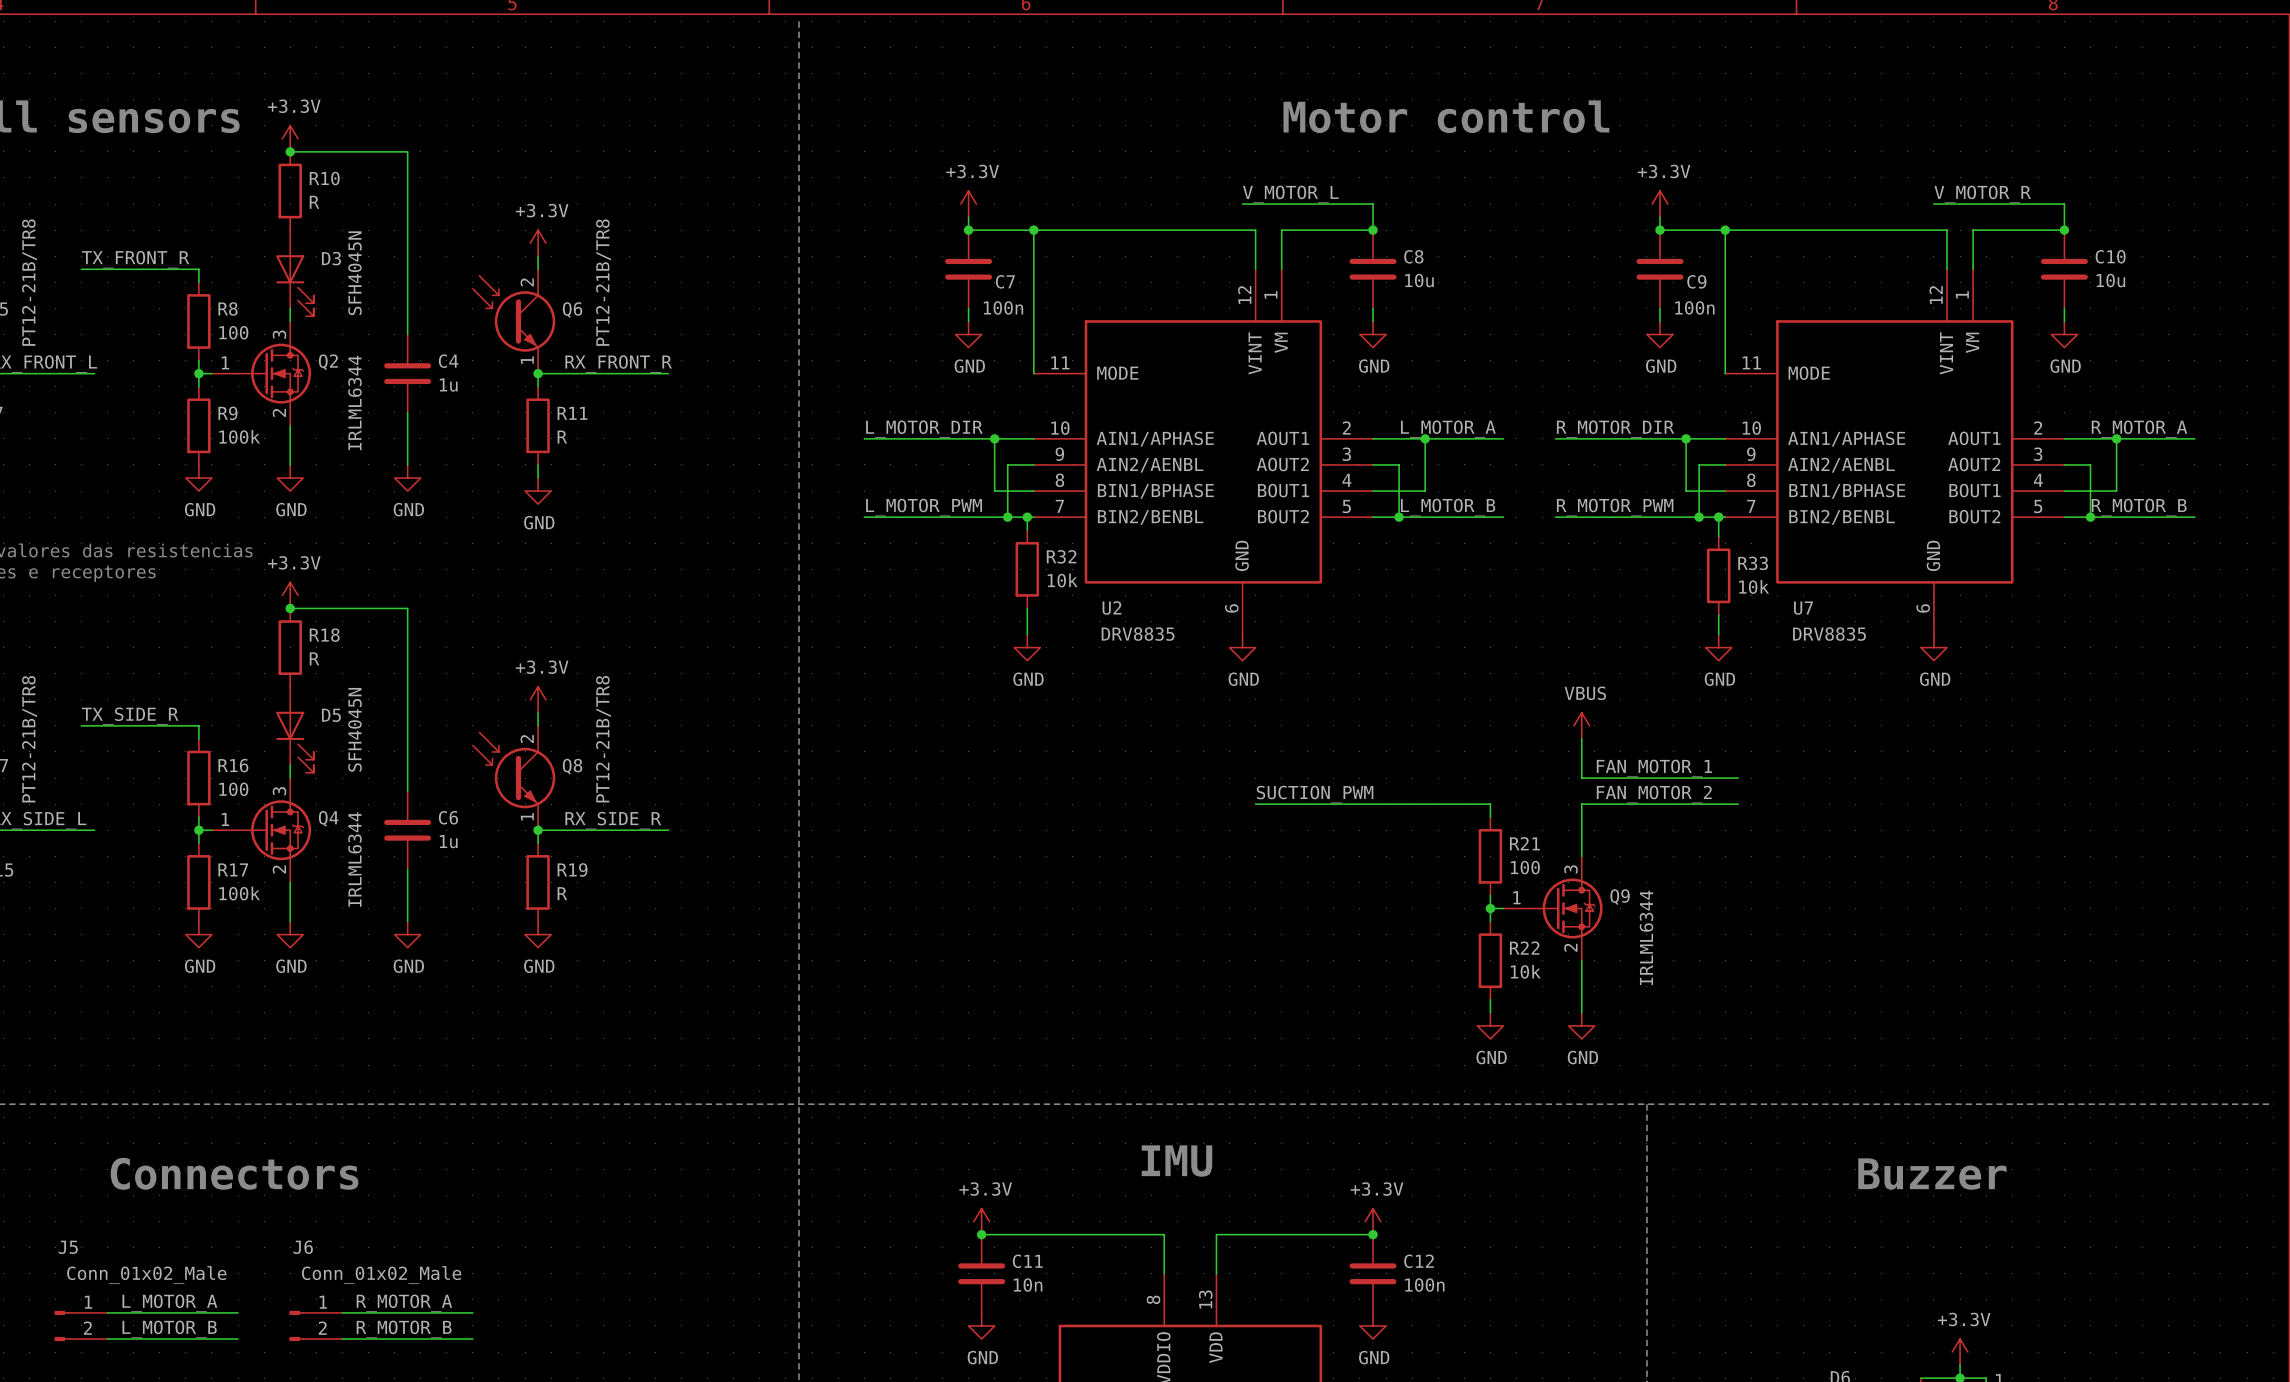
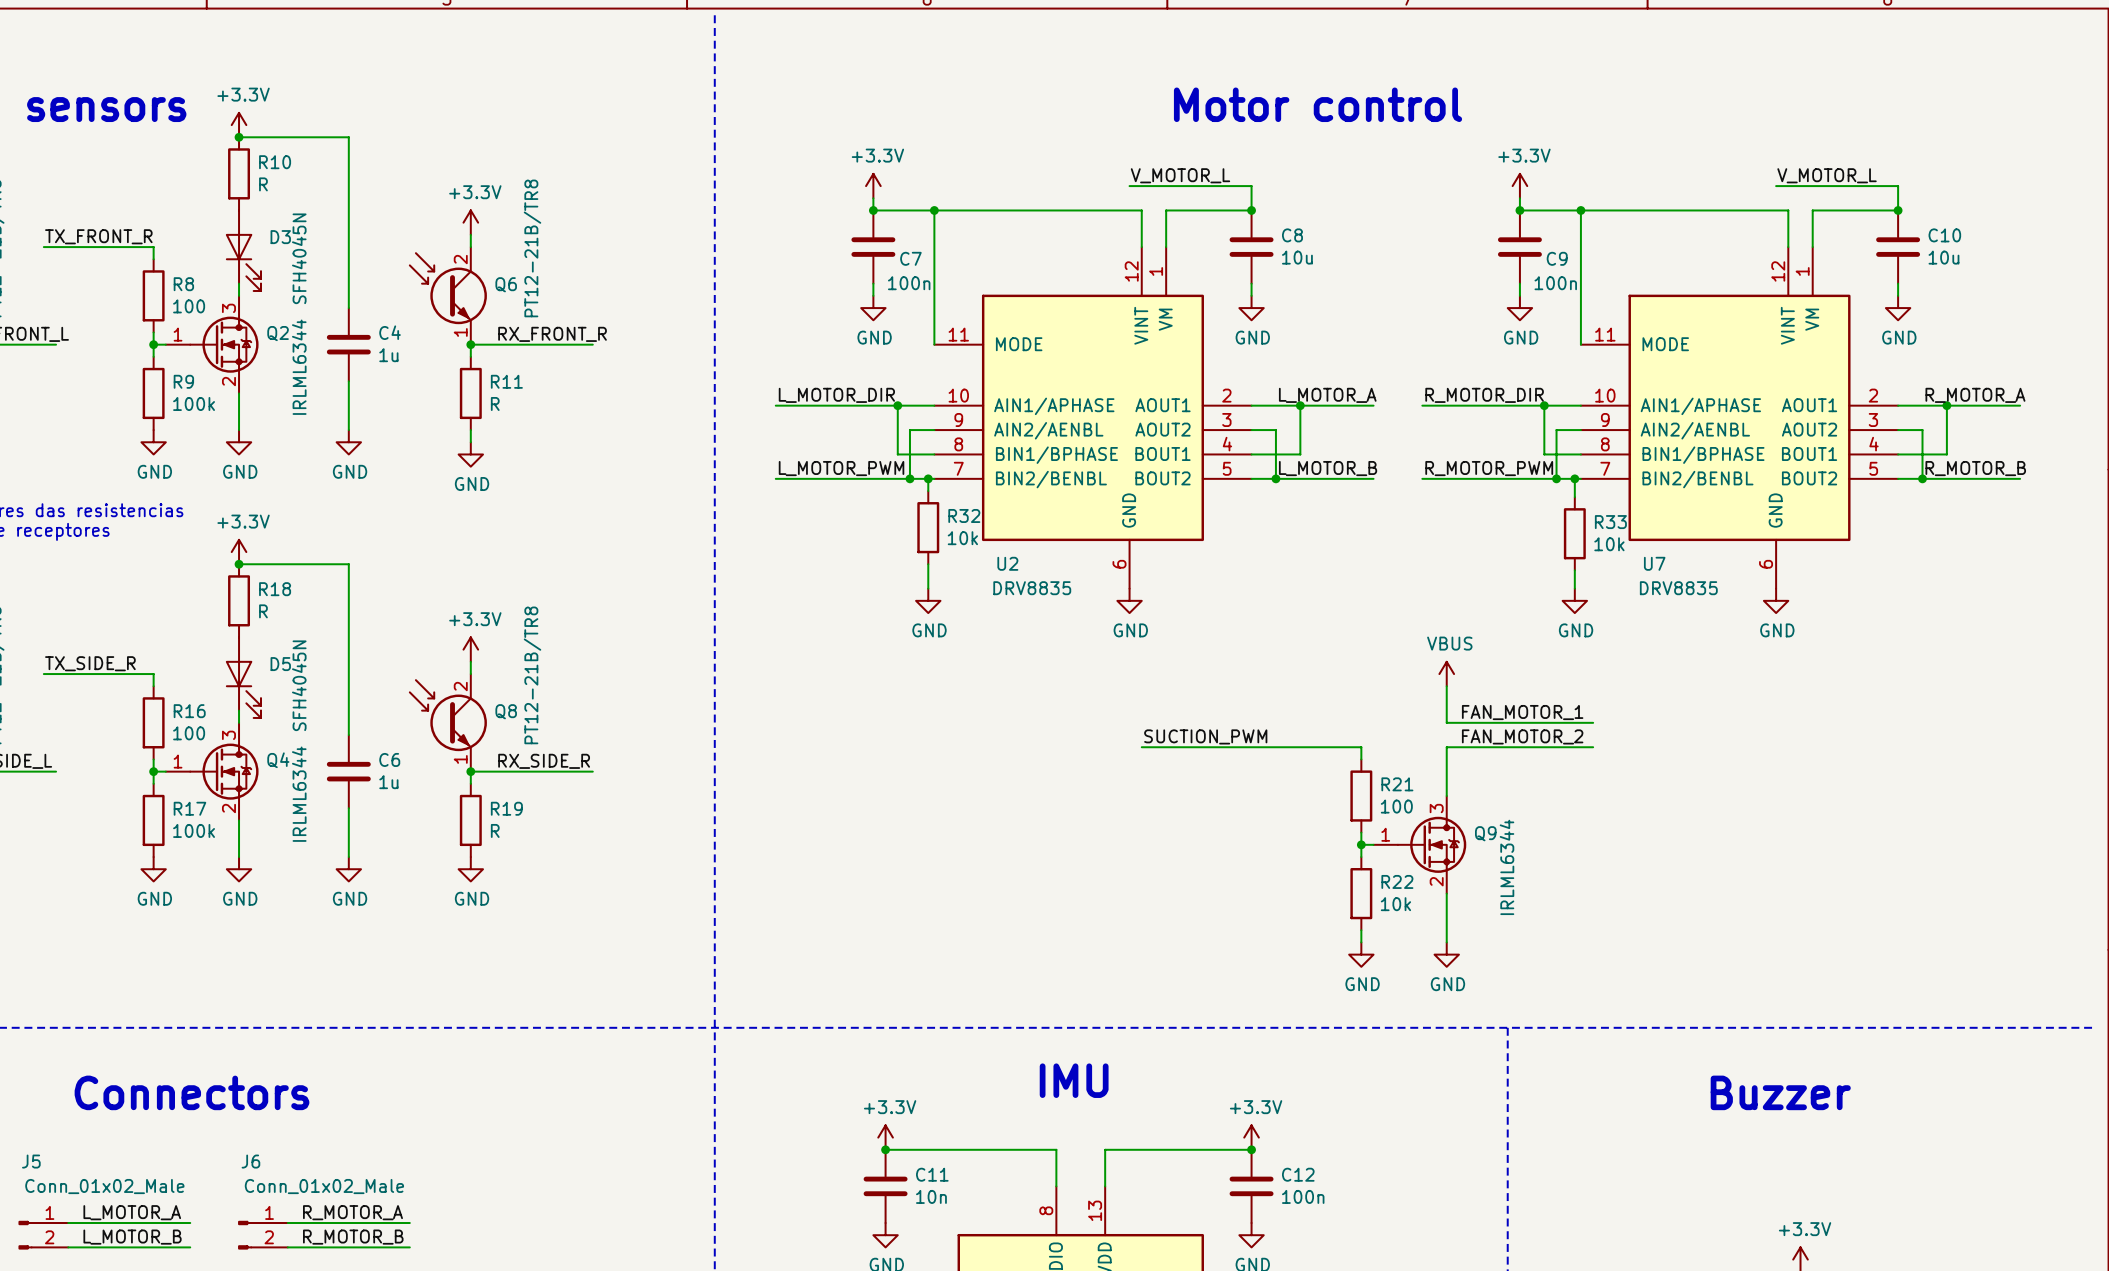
label: V_MOTOR_R (1982, 194) -> V_MOTOR_L (1827, 175)

